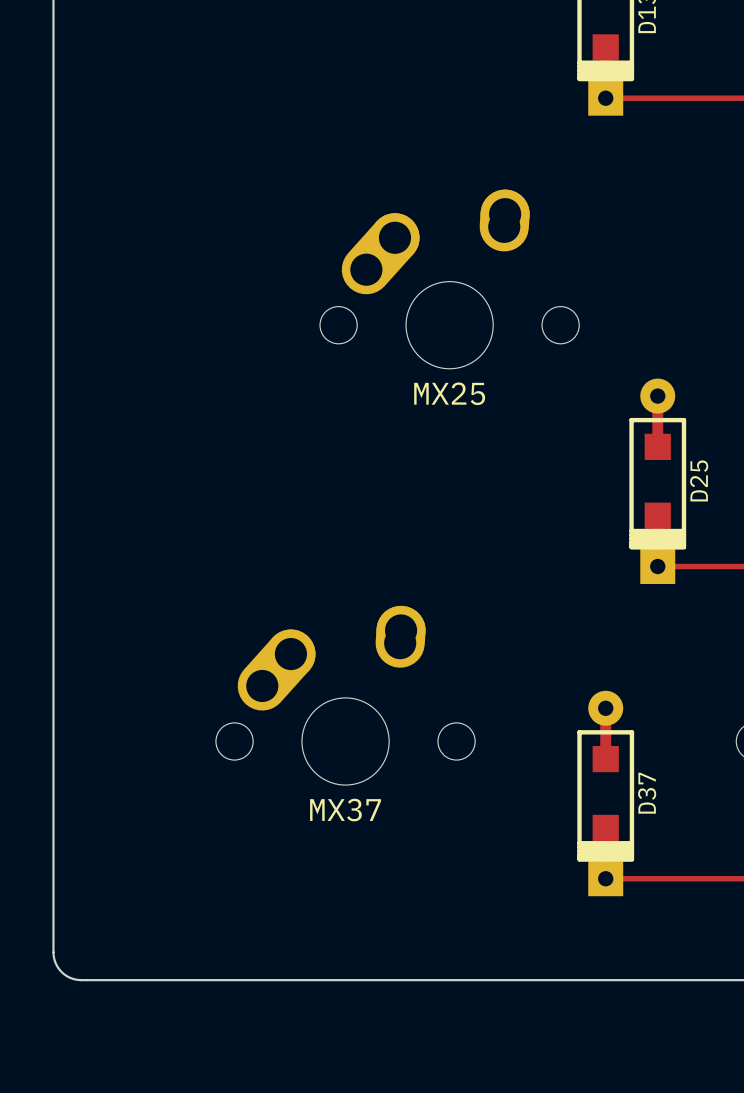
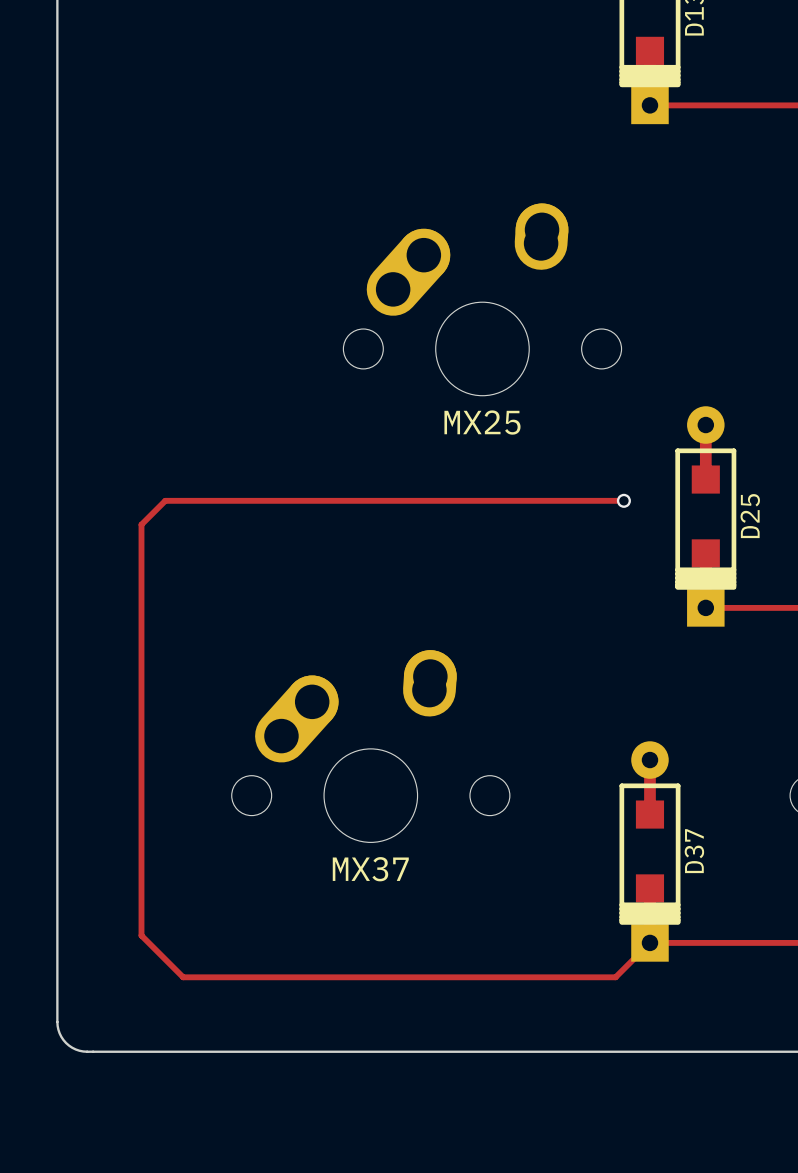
track: none -> (623, 500) (165, 500) (141, 524) (141, 935) (183, 977) (615, 977) (649, 942)
via: none -> (623, 500)

